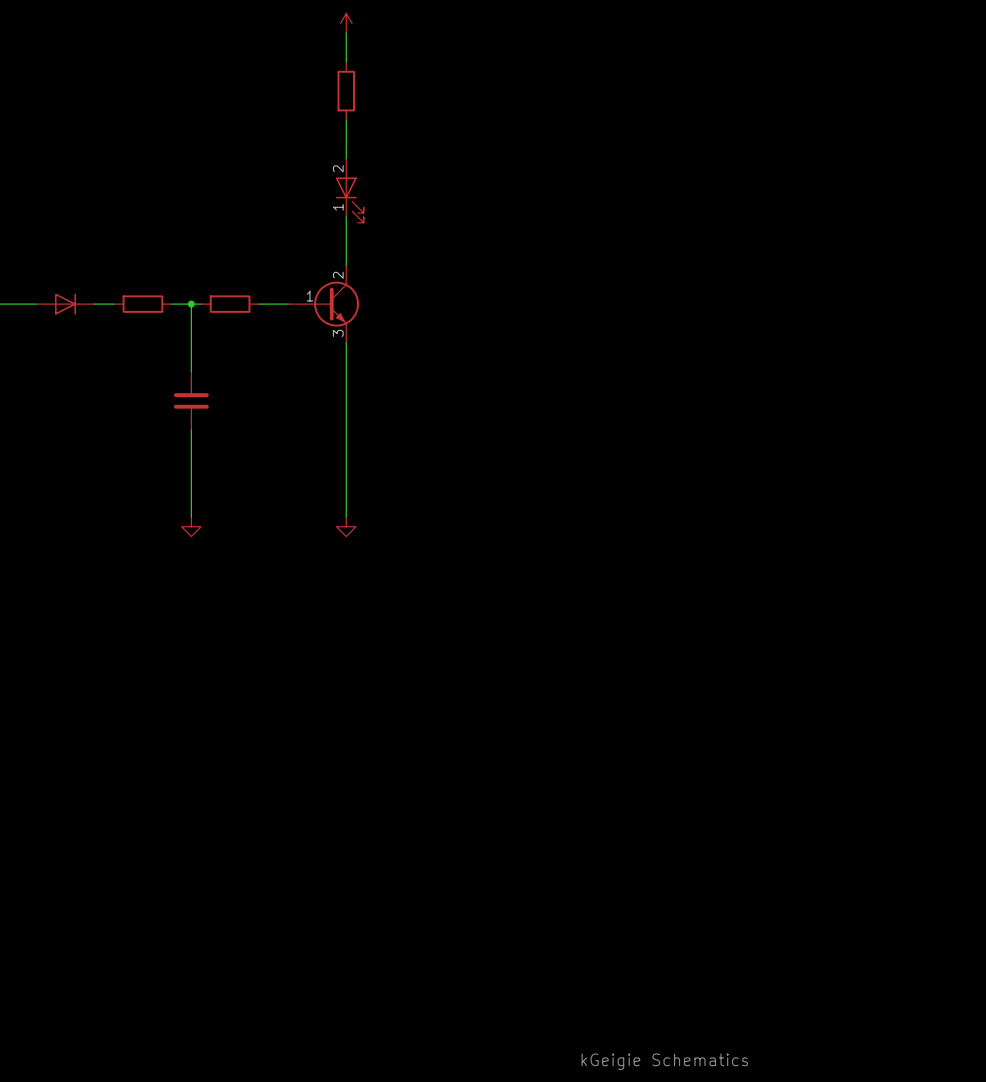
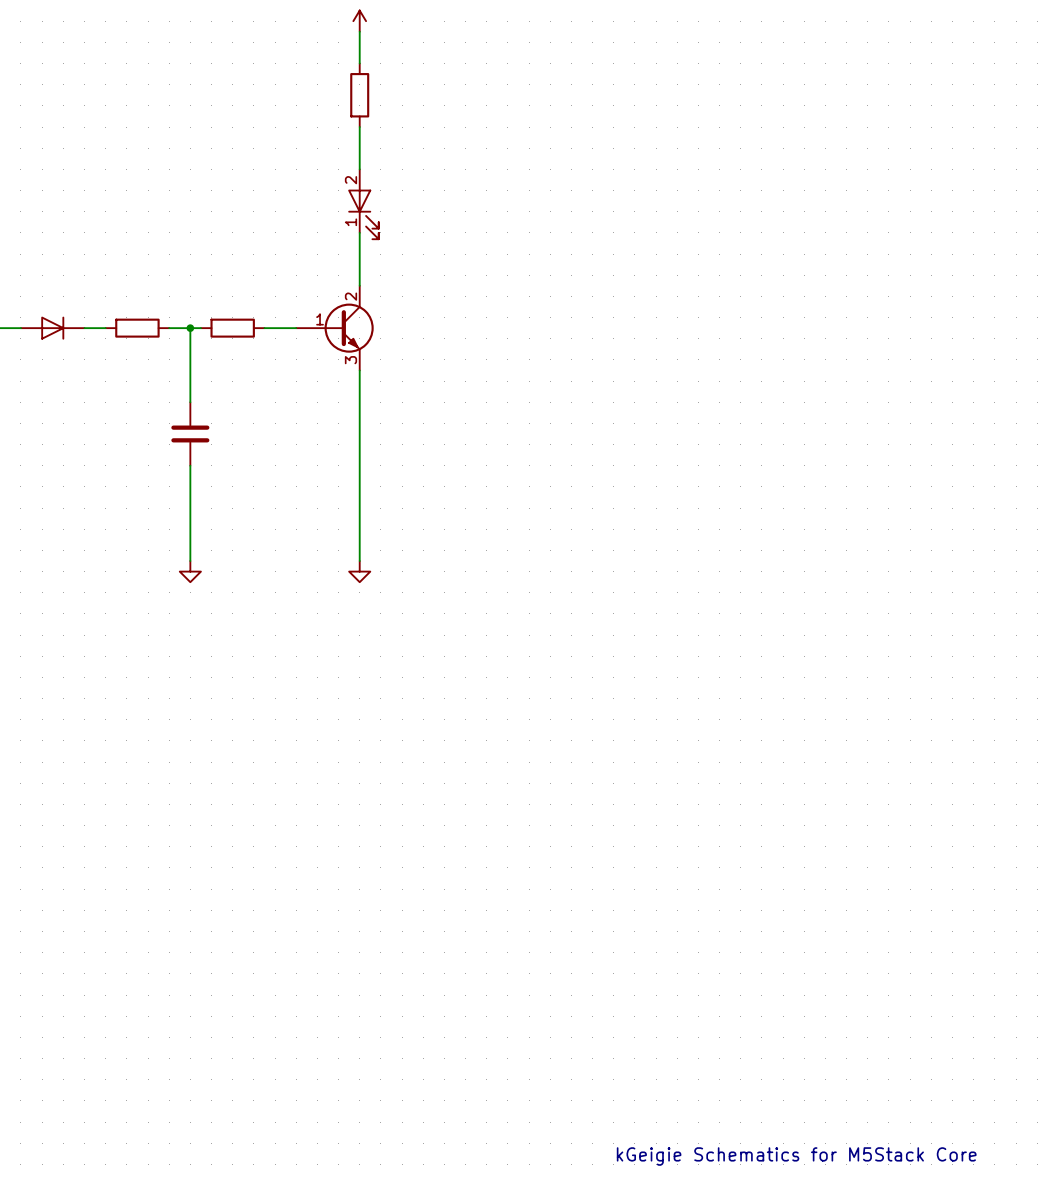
text: kGeigie Schematics (664, 1061) -> kGeigie Schematics for M5Stack Core (796, 1156)

